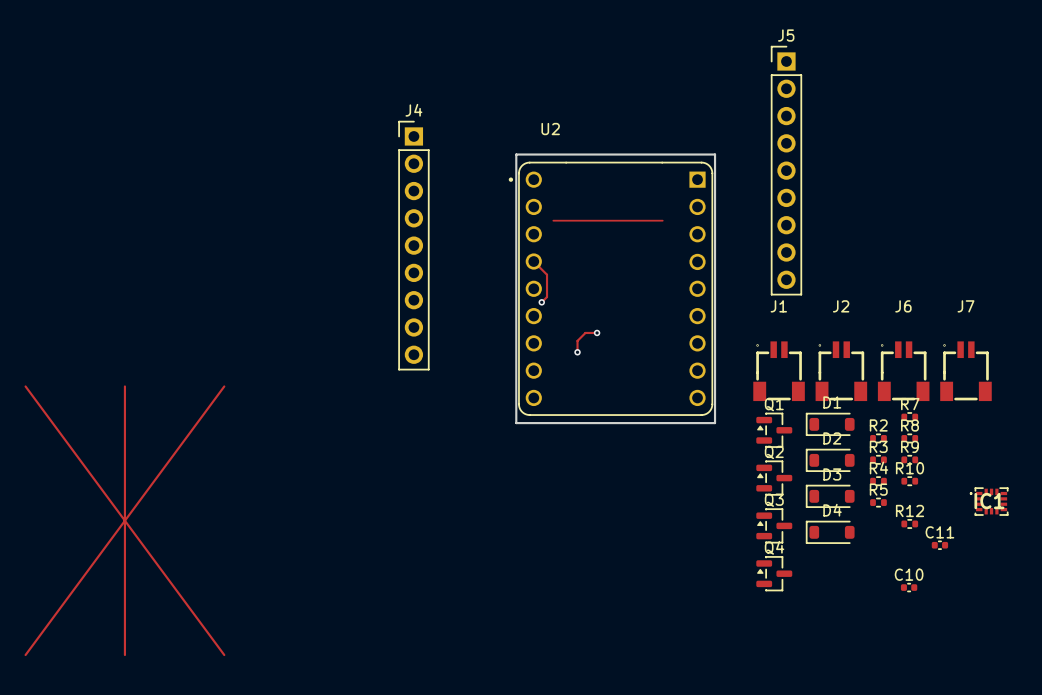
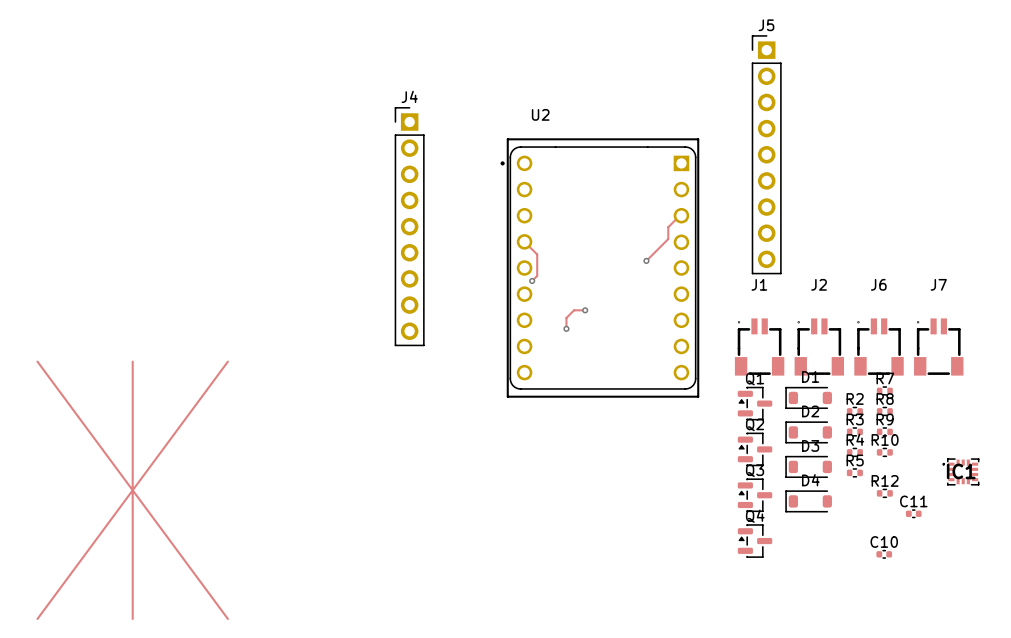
track: (553, 220) (662, 220) -> none
track: none -> (681, 215) (668, 227) (668, 239) (646, 260)
via: none -> (646, 260)

